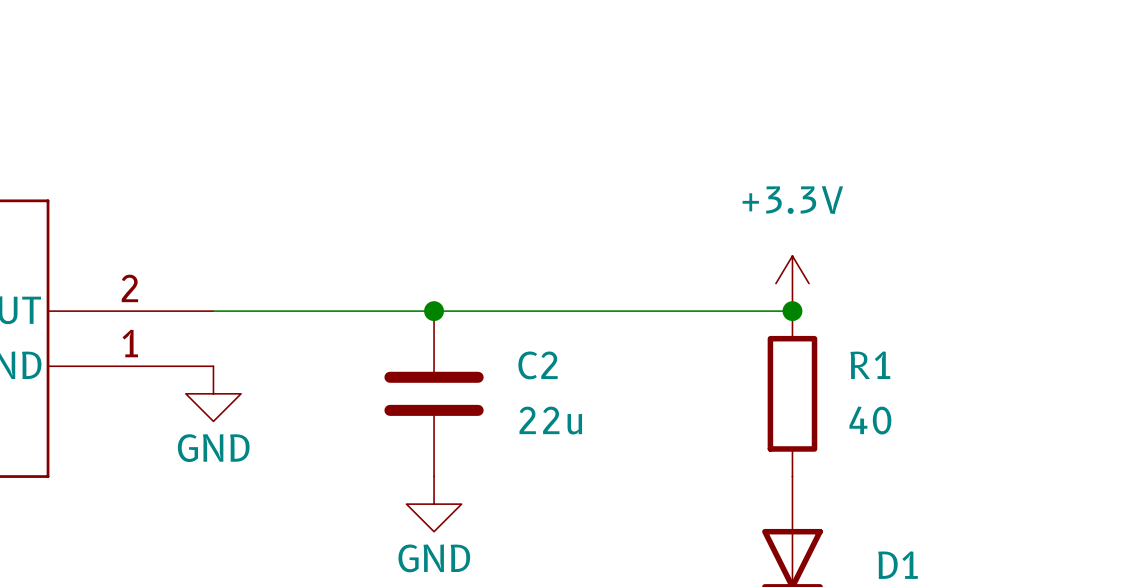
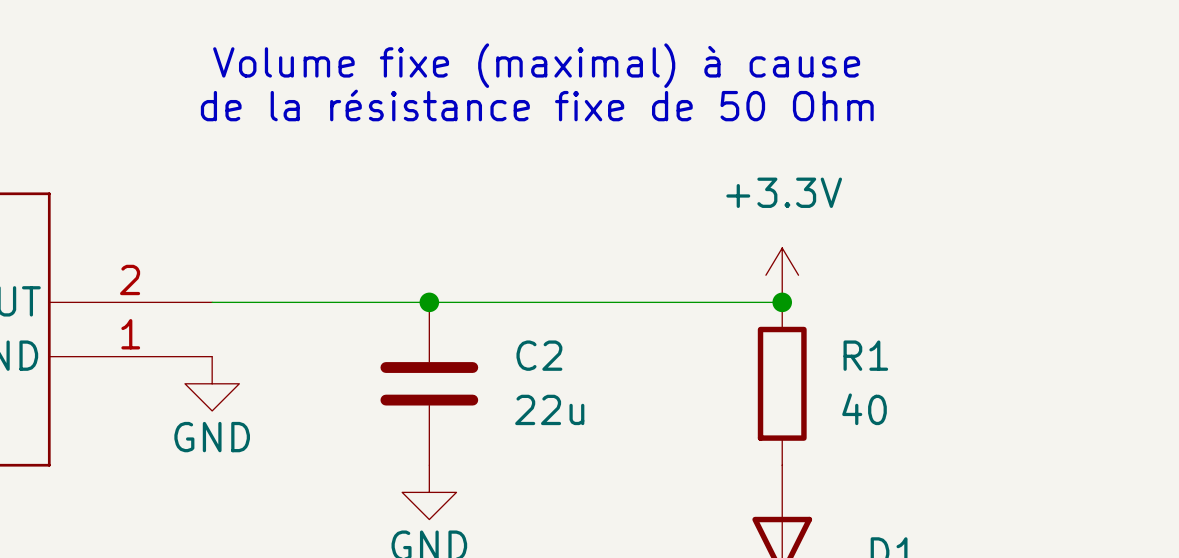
text: none -> Volume fixe (maximal) à cause (536, 65)
text: none -> de la résistance fixe de 50 Ohm (537, 105)

